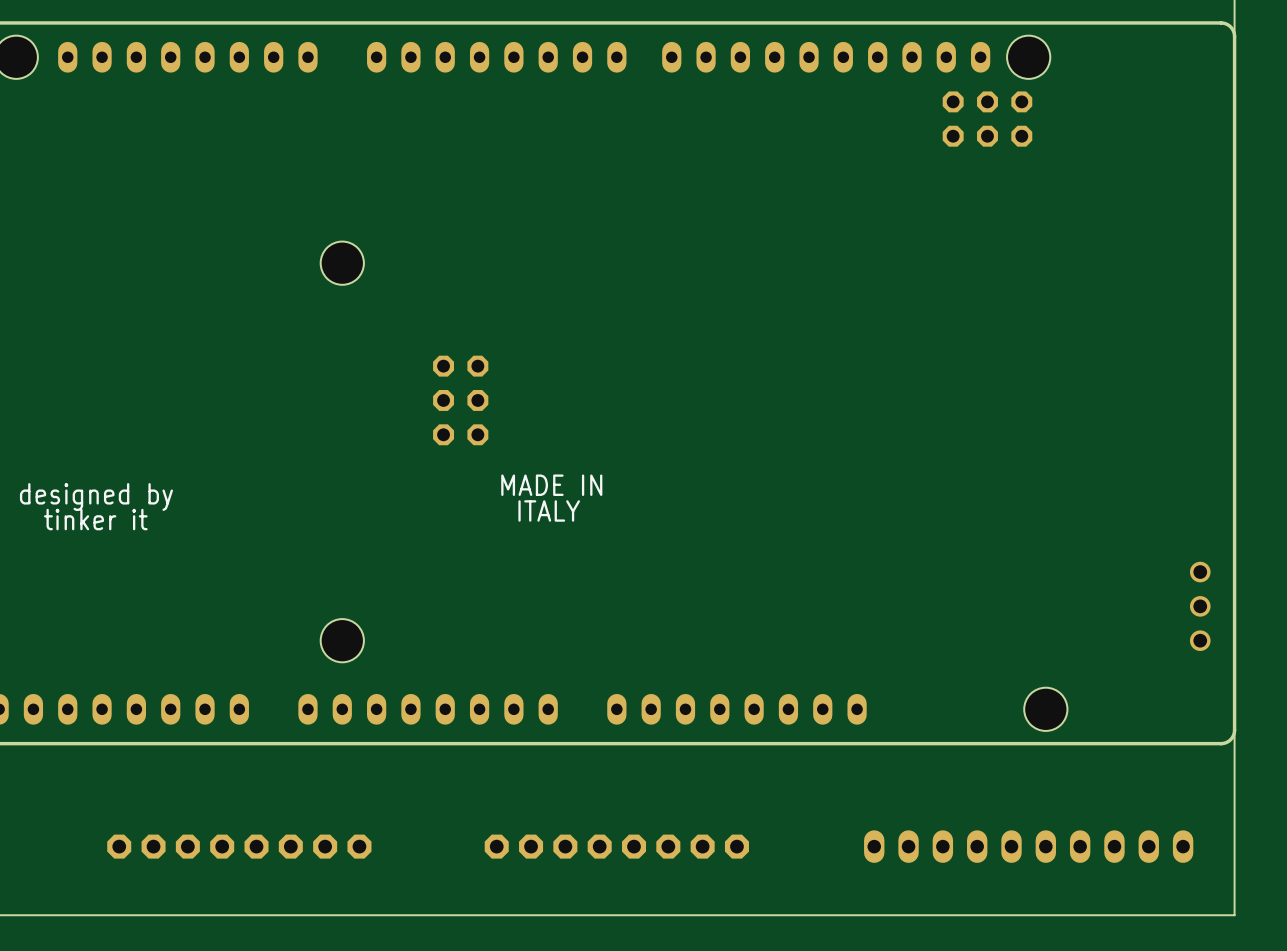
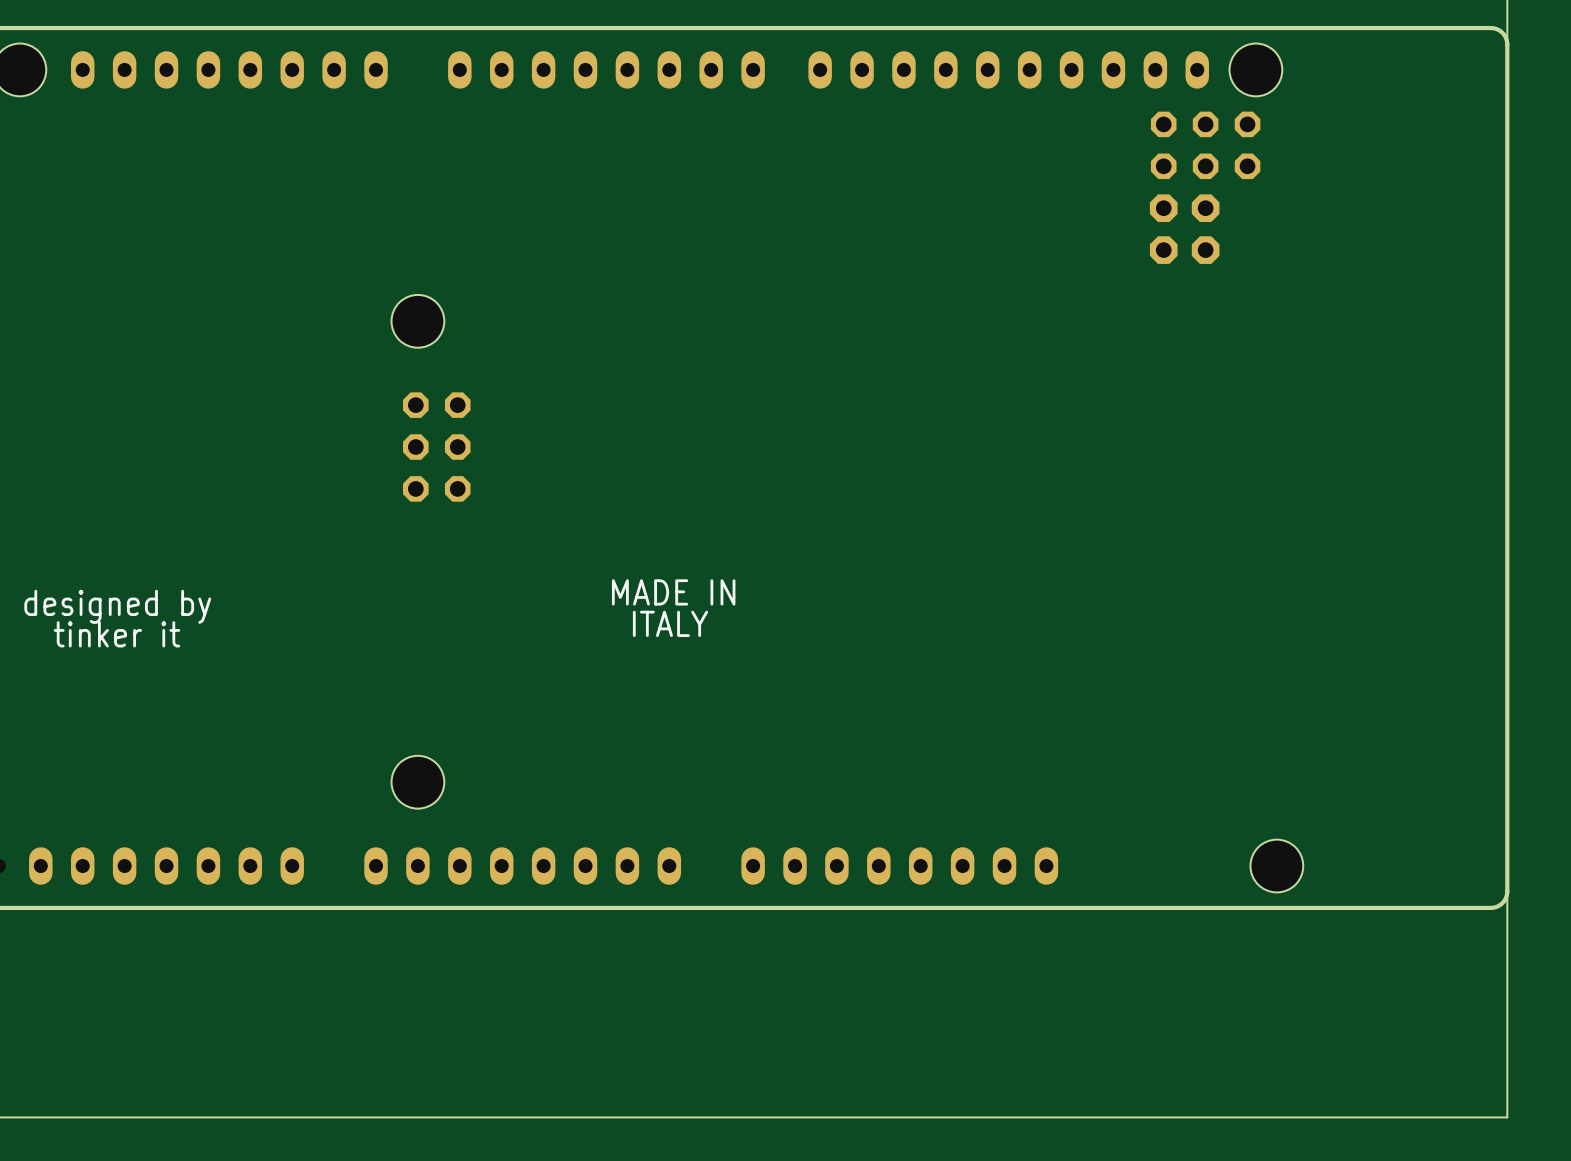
part: none -> (1184, 229)
part position: (460, 400) -> (436, 447)
part: (1200, 606) -> none
part: (239, 846) -> none
part: (616, 846) -> none
part: (1028, 846) -> none

